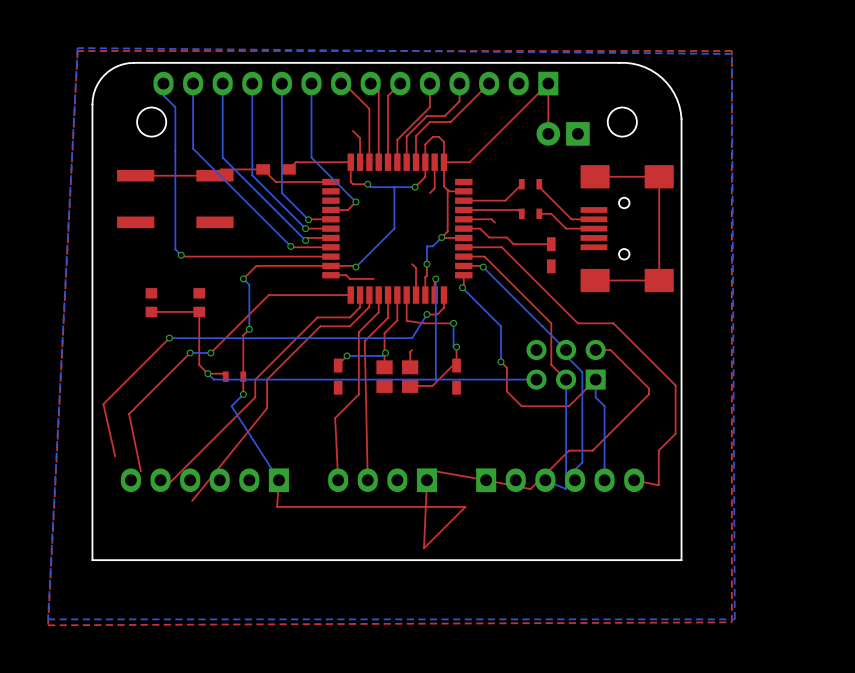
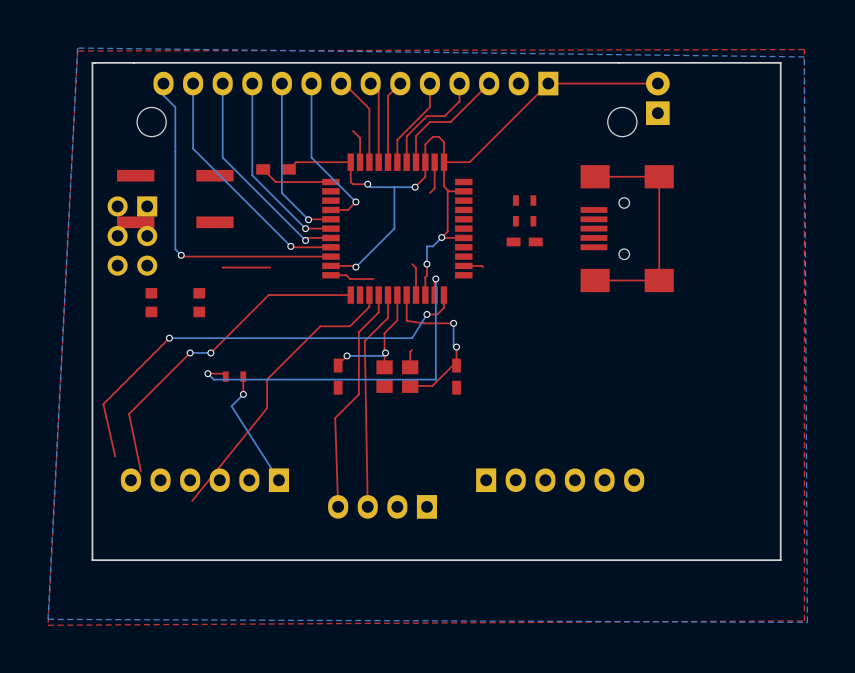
bottom zone outline: (77, 48) (731, 53) (734, 619) (48, 619) -> (77, 48) (804, 56) (807, 622) (48, 619)
top zone outline: (77, 51) (731, 51) (731, 622) (48, 625) -> (77, 51) (804, 49) (804, 620) (48, 625)
board edge: (133, 62) (118, 66) (104, 74) (95, 88) (92, 104) -> (133, 62) (92, 62) (92, 104)
board edge: (619, 62) (639, 65) (656, 73) (670, 88) (680, 112) (681, 560) -> (619, 62) (780, 62) (780, 560) (681, 560)
top track: (548, 83) (548, 133) -> (548, 83) (657, 83)
part rotation: 0° (563, 133) -> 90° clockwise (657, 98)
part position: (563, 133) -> (657, 98)
top track: (263, 169) (221, 169) (214, 175) (135, 175) -> none
top track: (521, 184) (505, 200) (463, 200) -> none
part: (530, 184) -> none
top track: (539, 184) (539, 187) (571, 219) (593, 219) -> none
part: none -> (524, 200)
top track: (463, 209) (517, 209) (521, 213) -> none
part: (530, 213) -> none
top track: (539, 213) (551, 213) (566, 228) (593, 228) -> none
top track: (463, 219) (491, 219) (495, 222) -> none
part: none -> (524, 221)
top track: (463, 228) (480, 228) (489, 237) (506, 237) (513, 244) (551, 244) -> none
part: none -> (132, 236)
top track: (463, 247) (501, 247) (577, 323) (613, 323) (675, 385) (675, 433) (658, 450) (658, 485) (634, 480) -> none
part rotation: 0° (551, 255) -> 90° clockwise (524, 241)
part position: (551, 255) -> (524, 241)
top track: (463, 256) (484, 256) (551, 323) (551, 364) (566, 379) -> none
top track: (330, 265) (256, 265) (243, 278) -> none
top track: none -> (270, 267) (222, 267)
bottom track: (483, 267) (566, 349) (566, 355) (582, 372) (582, 462) (574, 469) -> none
via: (483, 267) -> none
top track: (463, 275) (462, 287) -> none
bottom track: (243, 278) (249, 284) (249, 329) -> none
via: (243, 278) -> none
bottom track: (462, 287) (500, 326) (500, 361) -> none
via: (462, 287) -> none
top track: (360, 295) (360, 307) (349, 317) (317, 317) (255, 379) (255, 397) (166, 486) -> none
top track: (151, 311) (199, 311) (199, 365) (207, 373) -> none
top track: (249, 329) (243, 335) (243, 376) -> none
via: (249, 329) -> none
top track: (364, 341) (367, 480) -> (364, 341) (367, 506)
top track: (595, 349) (610, 349) (648, 388) (648, 394) (592, 450) (569, 450) (530, 489) (435, 471) (426, 480) (424, 548) (465, 506) (277, 506) (278, 480) -> none
top track: (500, 361) (506, 367) (506, 391) (521, 406) (569, 406) (595, 379) -> none
via: (500, 361) -> none
part: (566, 364) -> none
bottom track: (536, 379) (435, 379) -> none
bottom track: (566, 379) (566, 489) (545, 480) -> none
bottom track: (595, 379) (595, 397) (604, 406) (604, 480) -> none
top track: (335, 418) (338, 480) -> (335, 418) (338, 506)
part position: (382, 480) -> (382, 506)

